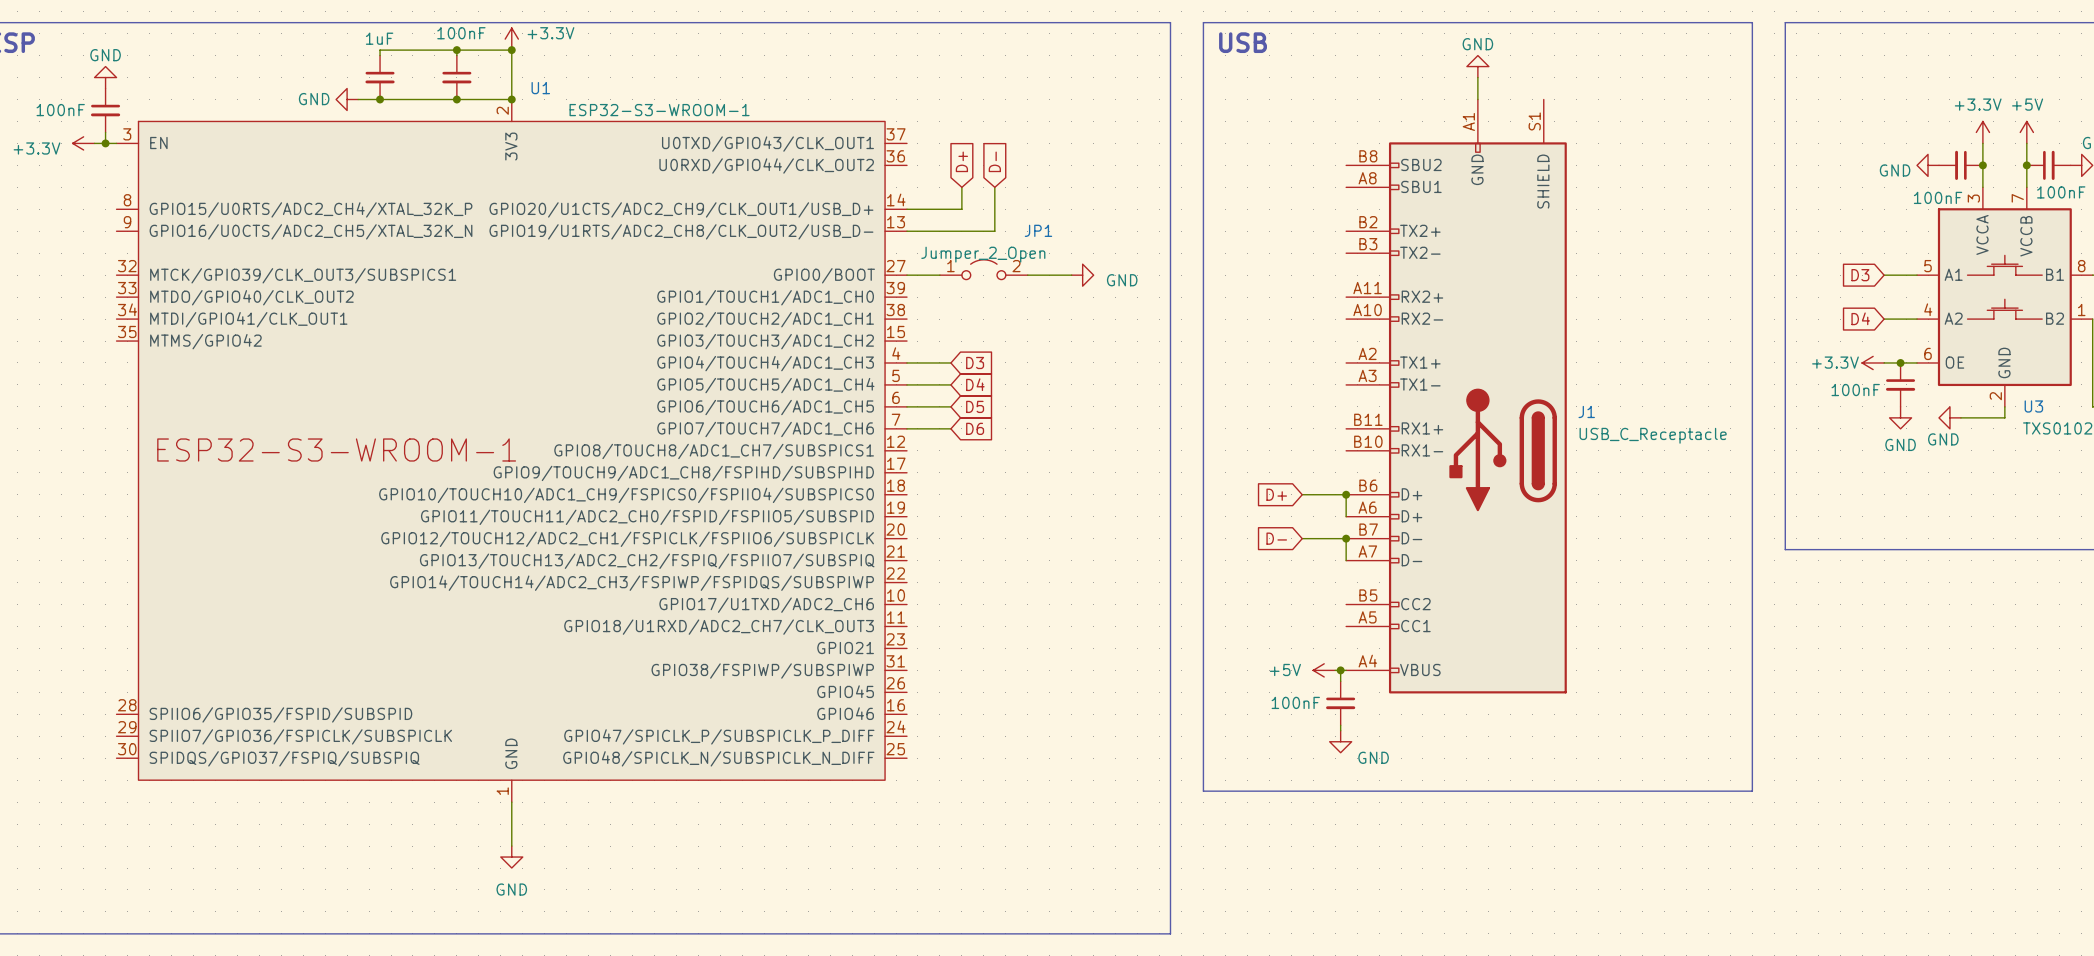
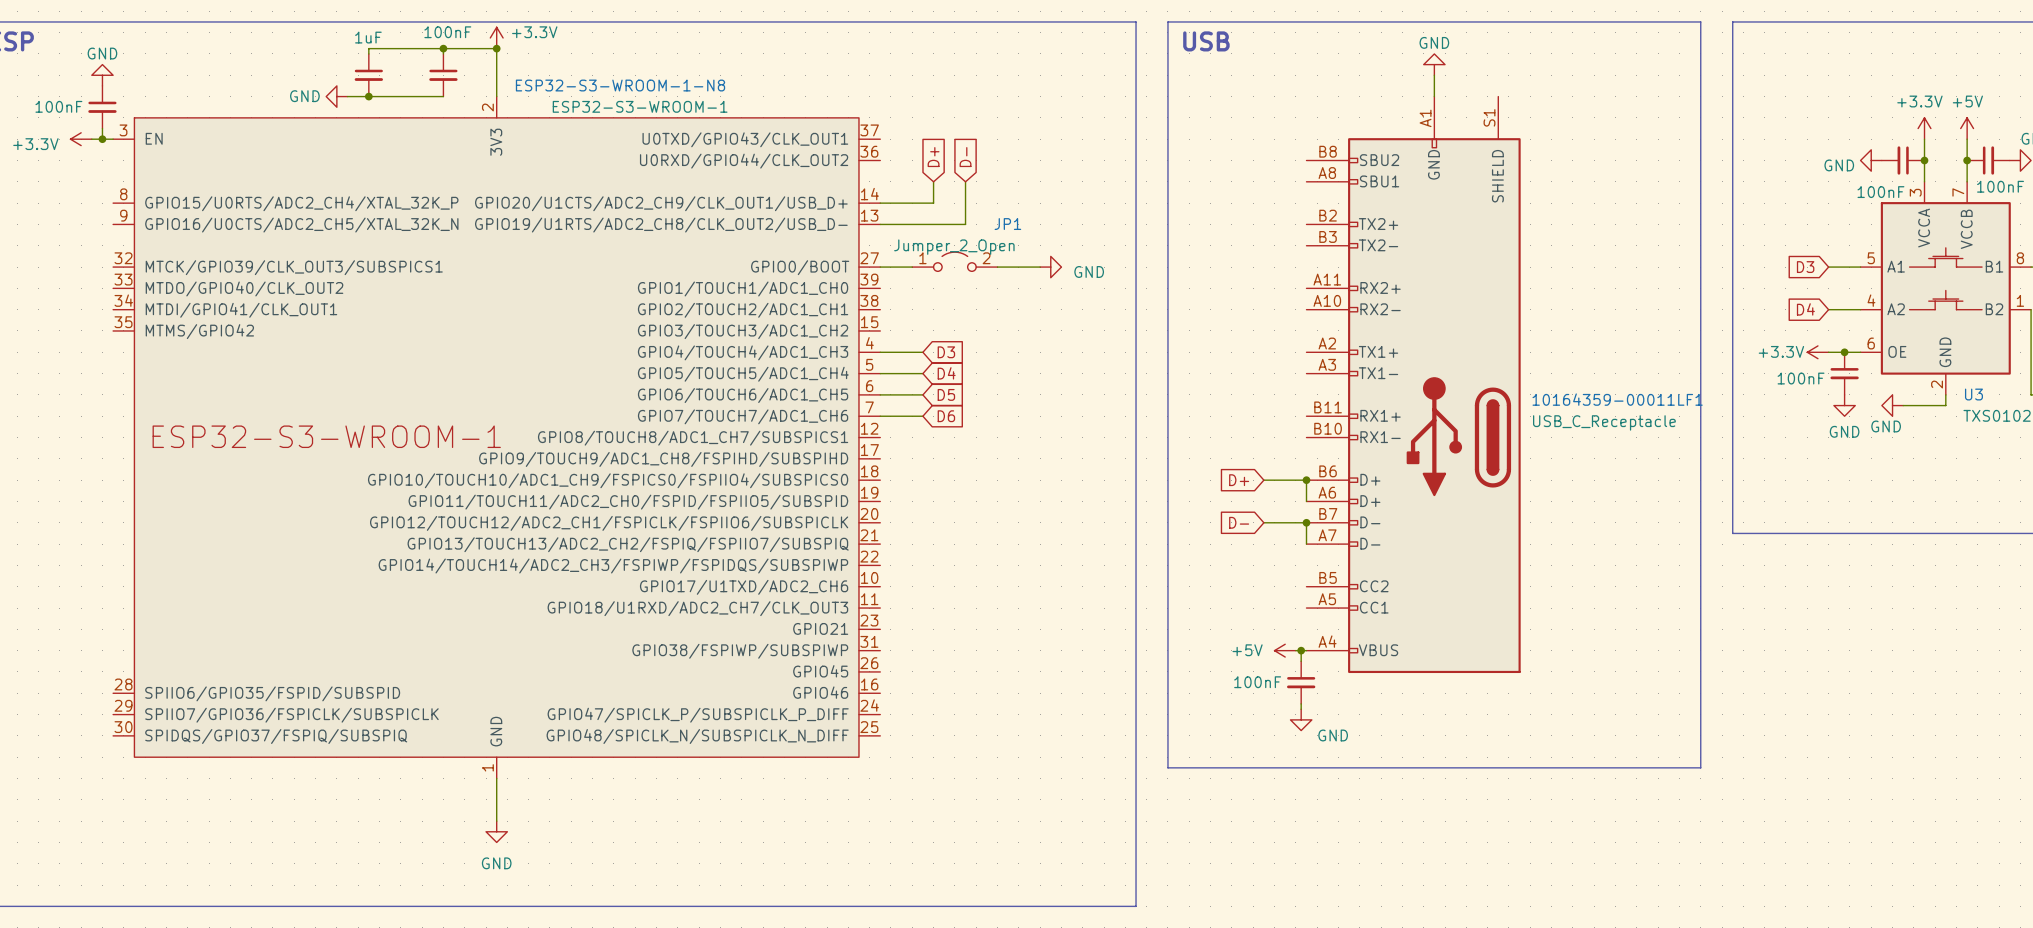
U1 name: U1 (540, 88) -> ESP32-S3-WROOM-1-N8 (620, 85)
wire: (456, 99) (511, 99) -> none
junction: (456, 99) -> none
junction: (511, 99) -> none
J1 name: J1 (1586, 411) -> 10164359-00011LF1 (1617, 399)

